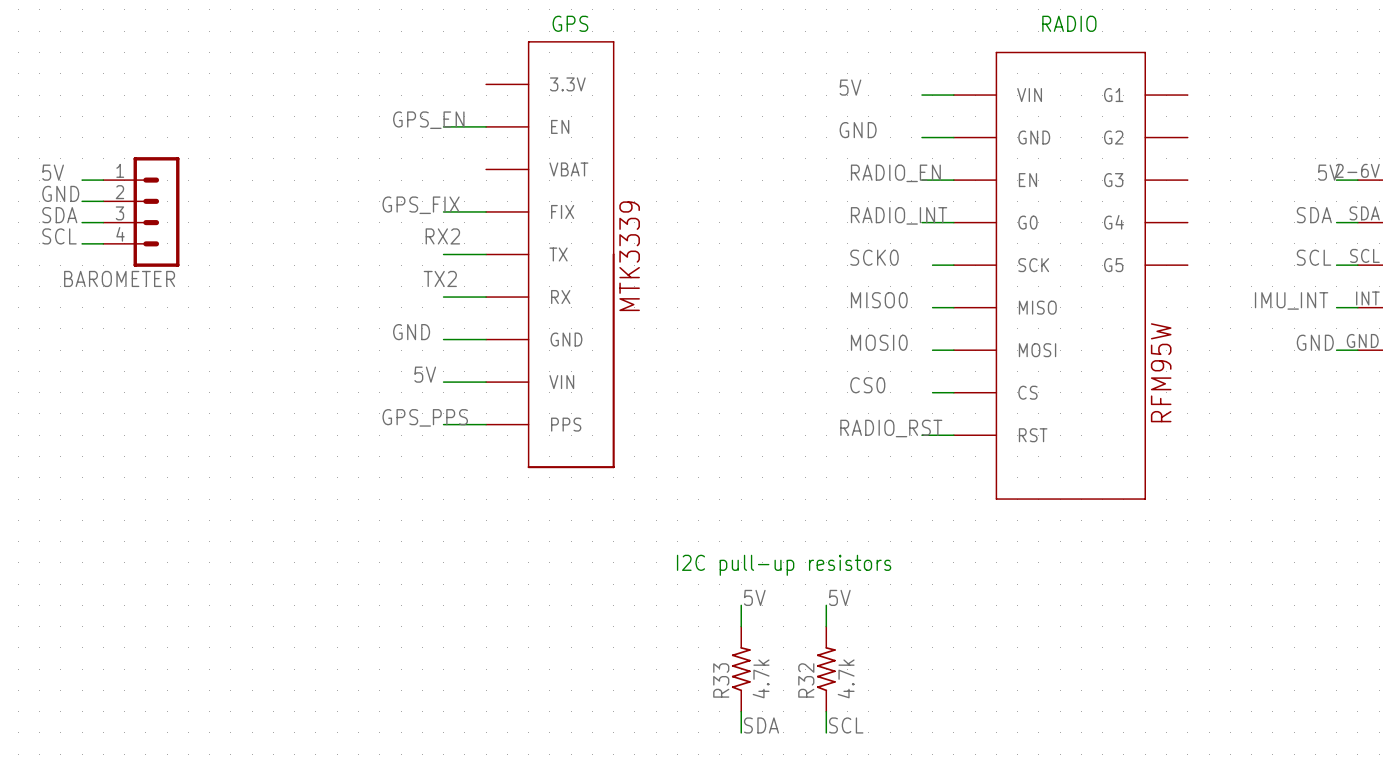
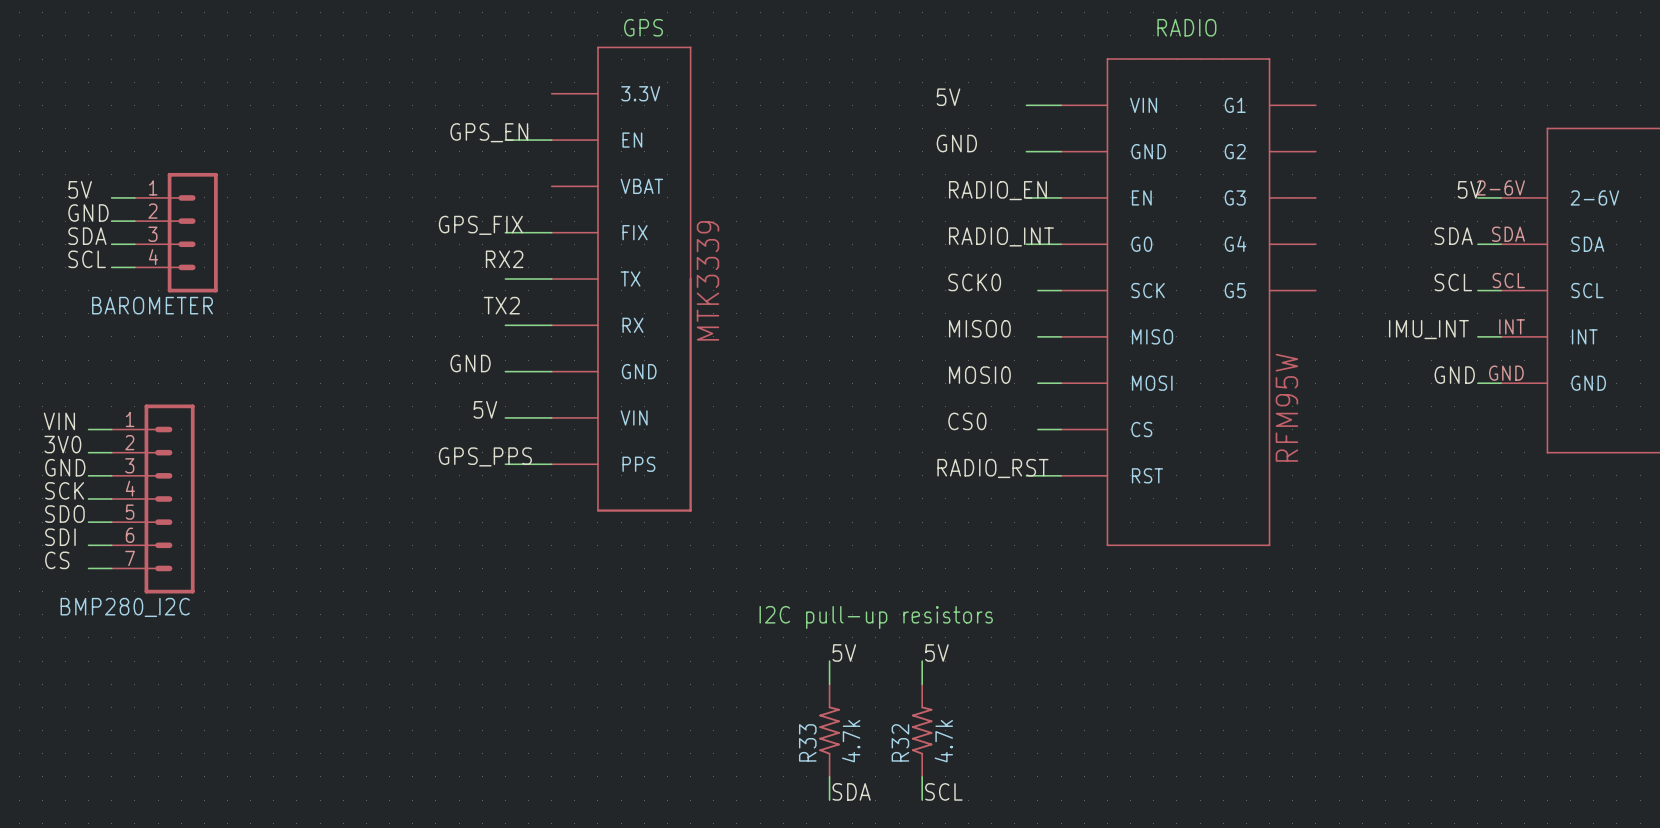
label: none -> VIN (59, 421)
wire: none -> (88, 429) (111, 429)
label: none -> 3V0 (62, 444)
wire: none -> (88, 452) (111, 452)
label: none -> GND (65, 467)
wire: none -> (88, 475) (111, 475)
label: none -> SCK (64, 490)
wire: none -> (88, 498) (111, 498)
BMP280_I2C: none -> (153, 498)
label: none -> SDO (64, 514)
wire: none -> (88, 522) (111, 522)
label: none -> SDI (60, 537)
wire: none -> (88, 545) (111, 545)
label: none -> CS (57, 560)
wire: none -> (88, 568) (111, 568)

